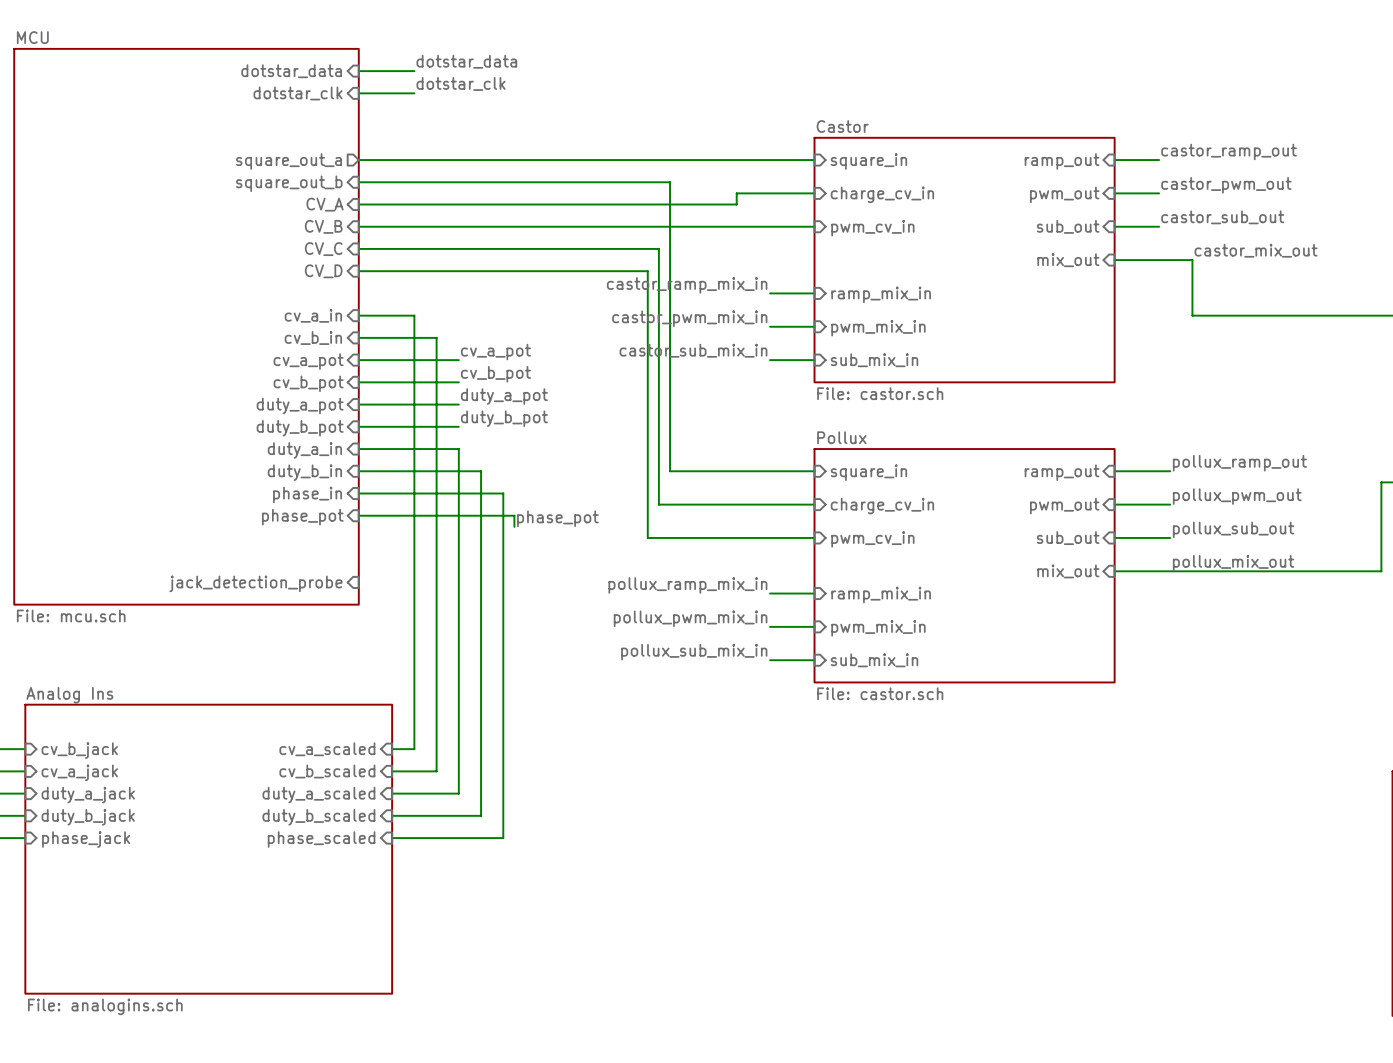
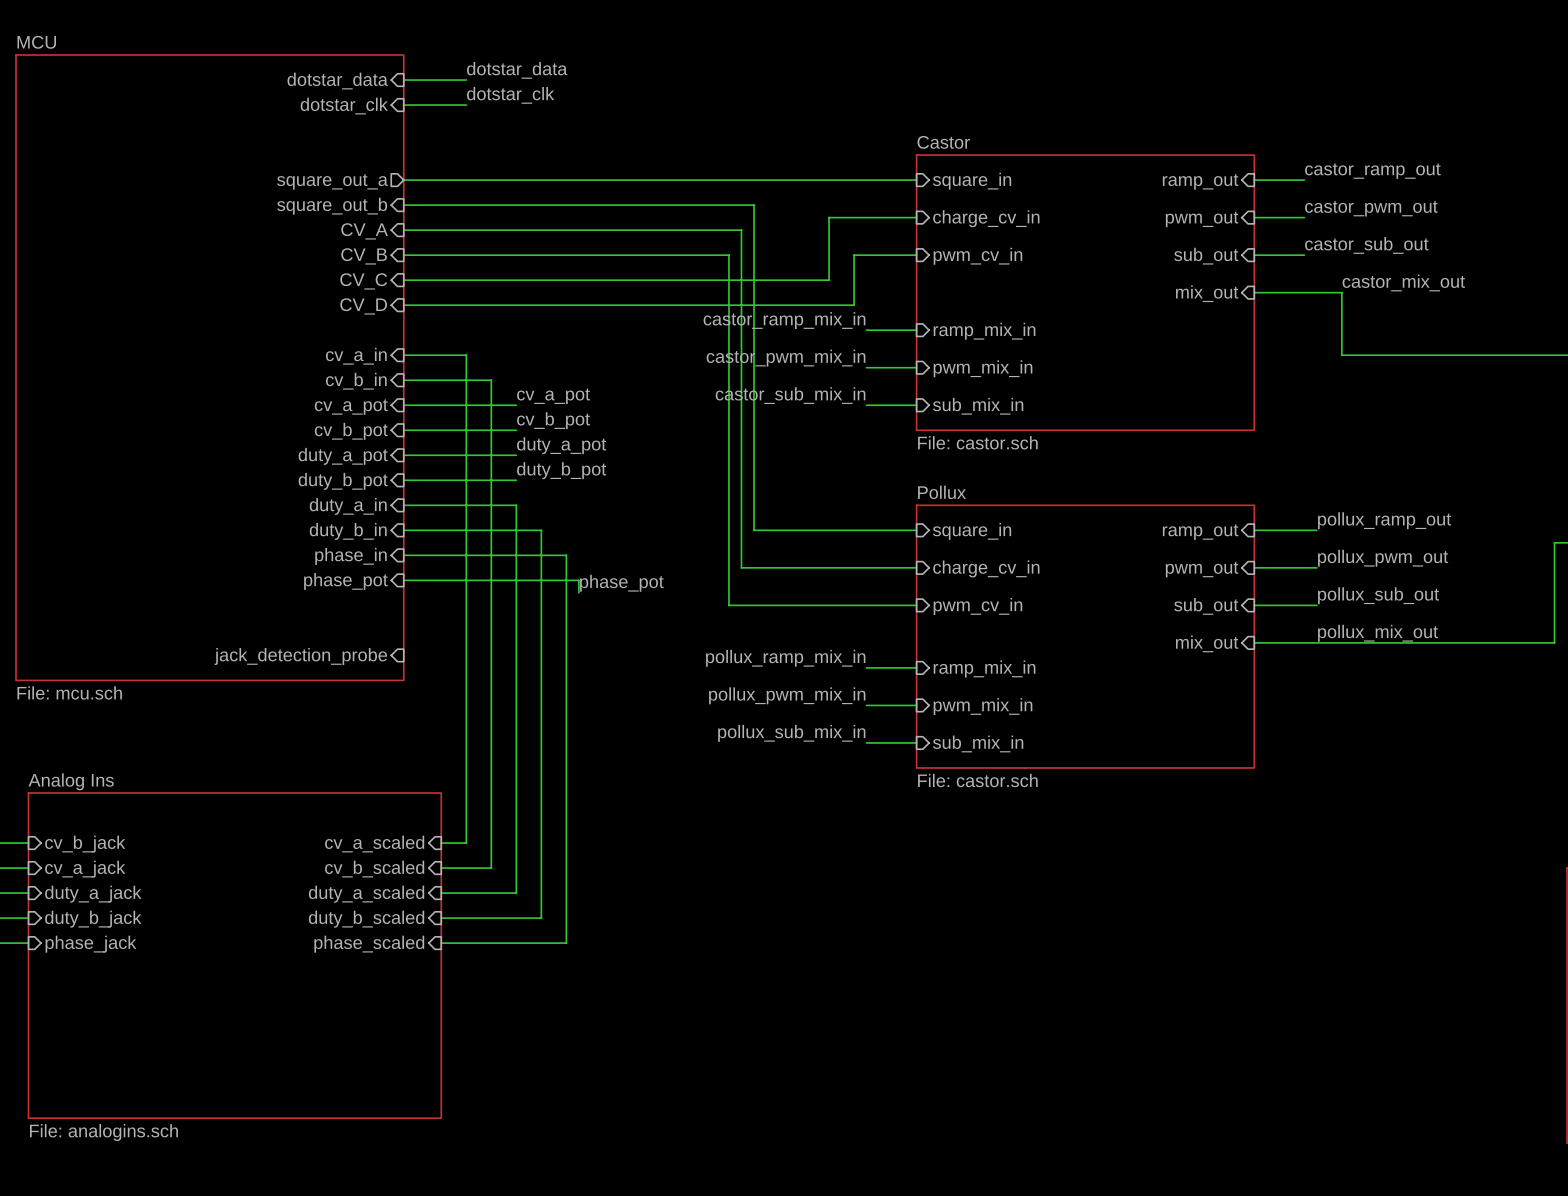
wire: (658, 204) (736, 204) -> (741, 230) (741, 280) (829, 280) (829, 230)
wire: (647, 226) (758, 226) -> (728, 255) (728, 305) (854, 305) (854, 255)

